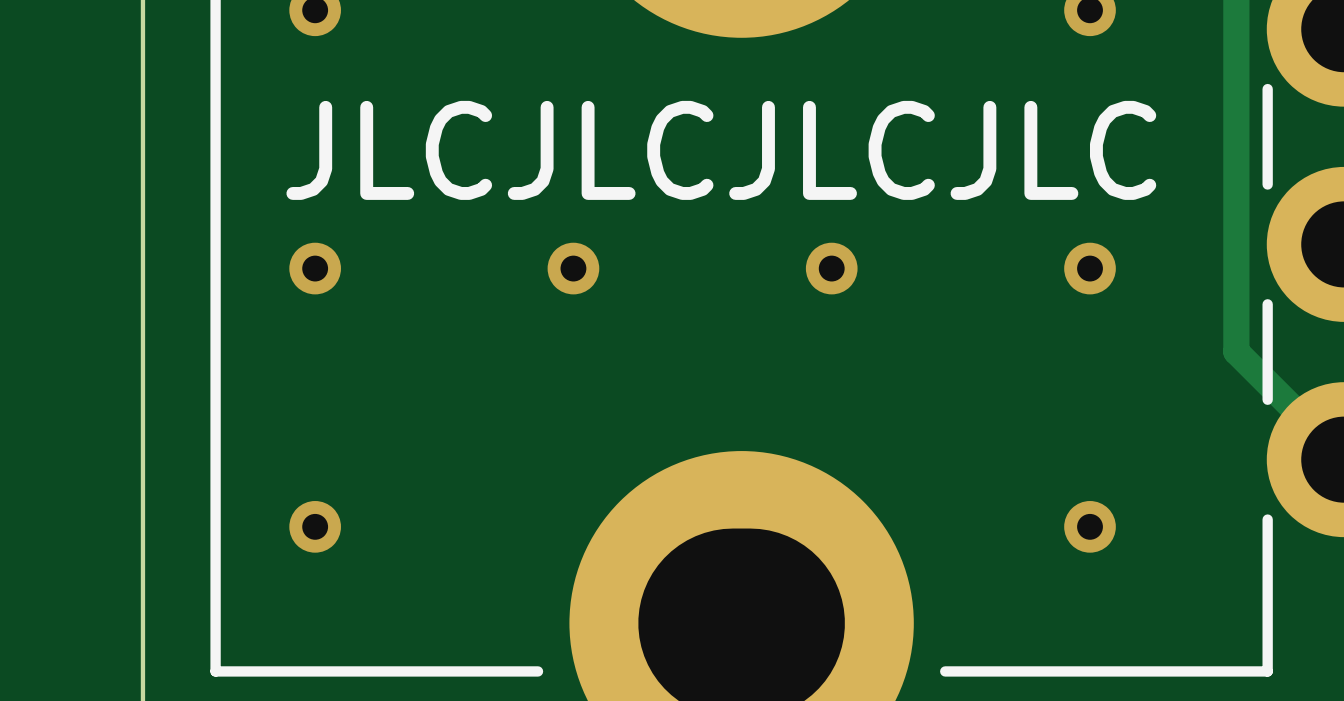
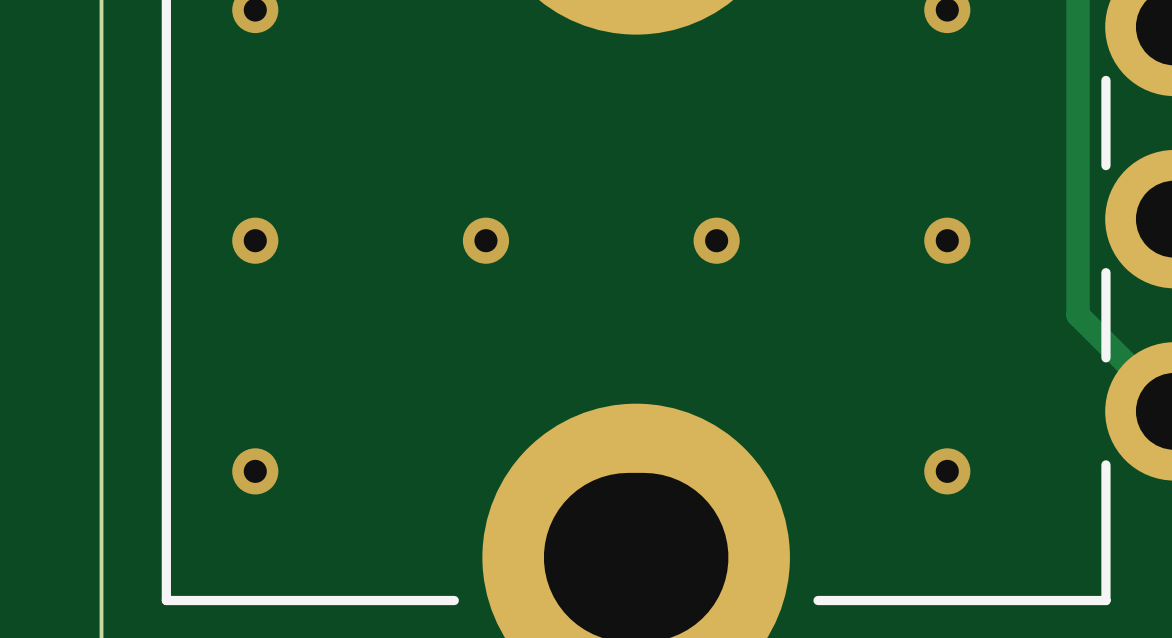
text: JLCJLCJLCJLC (721, 150) -> none

